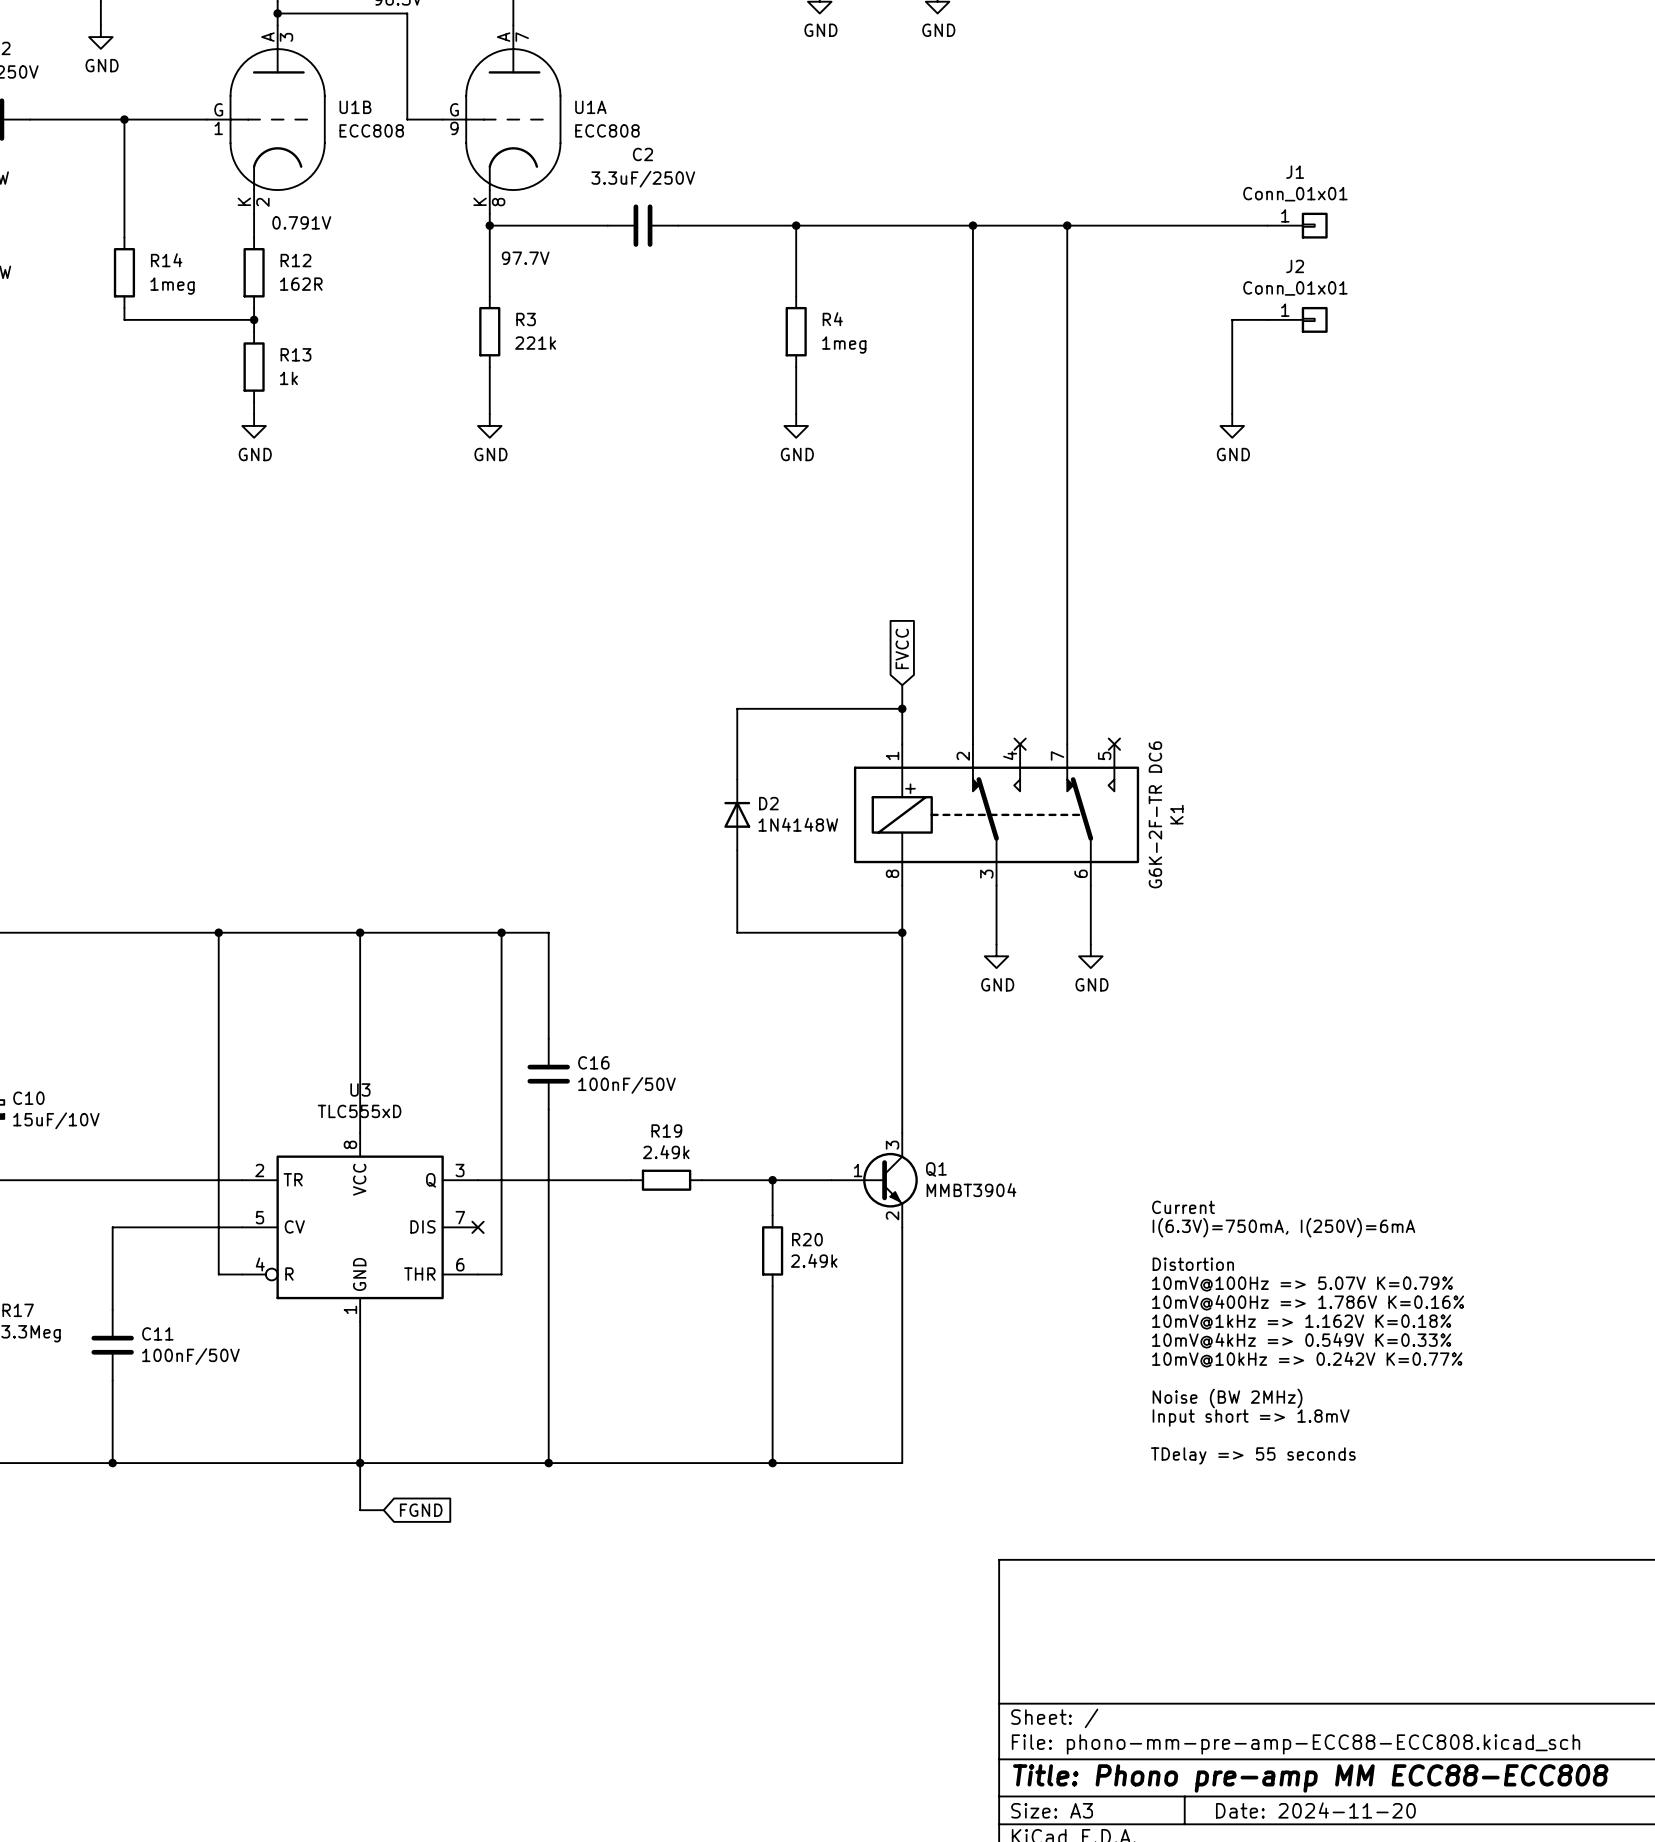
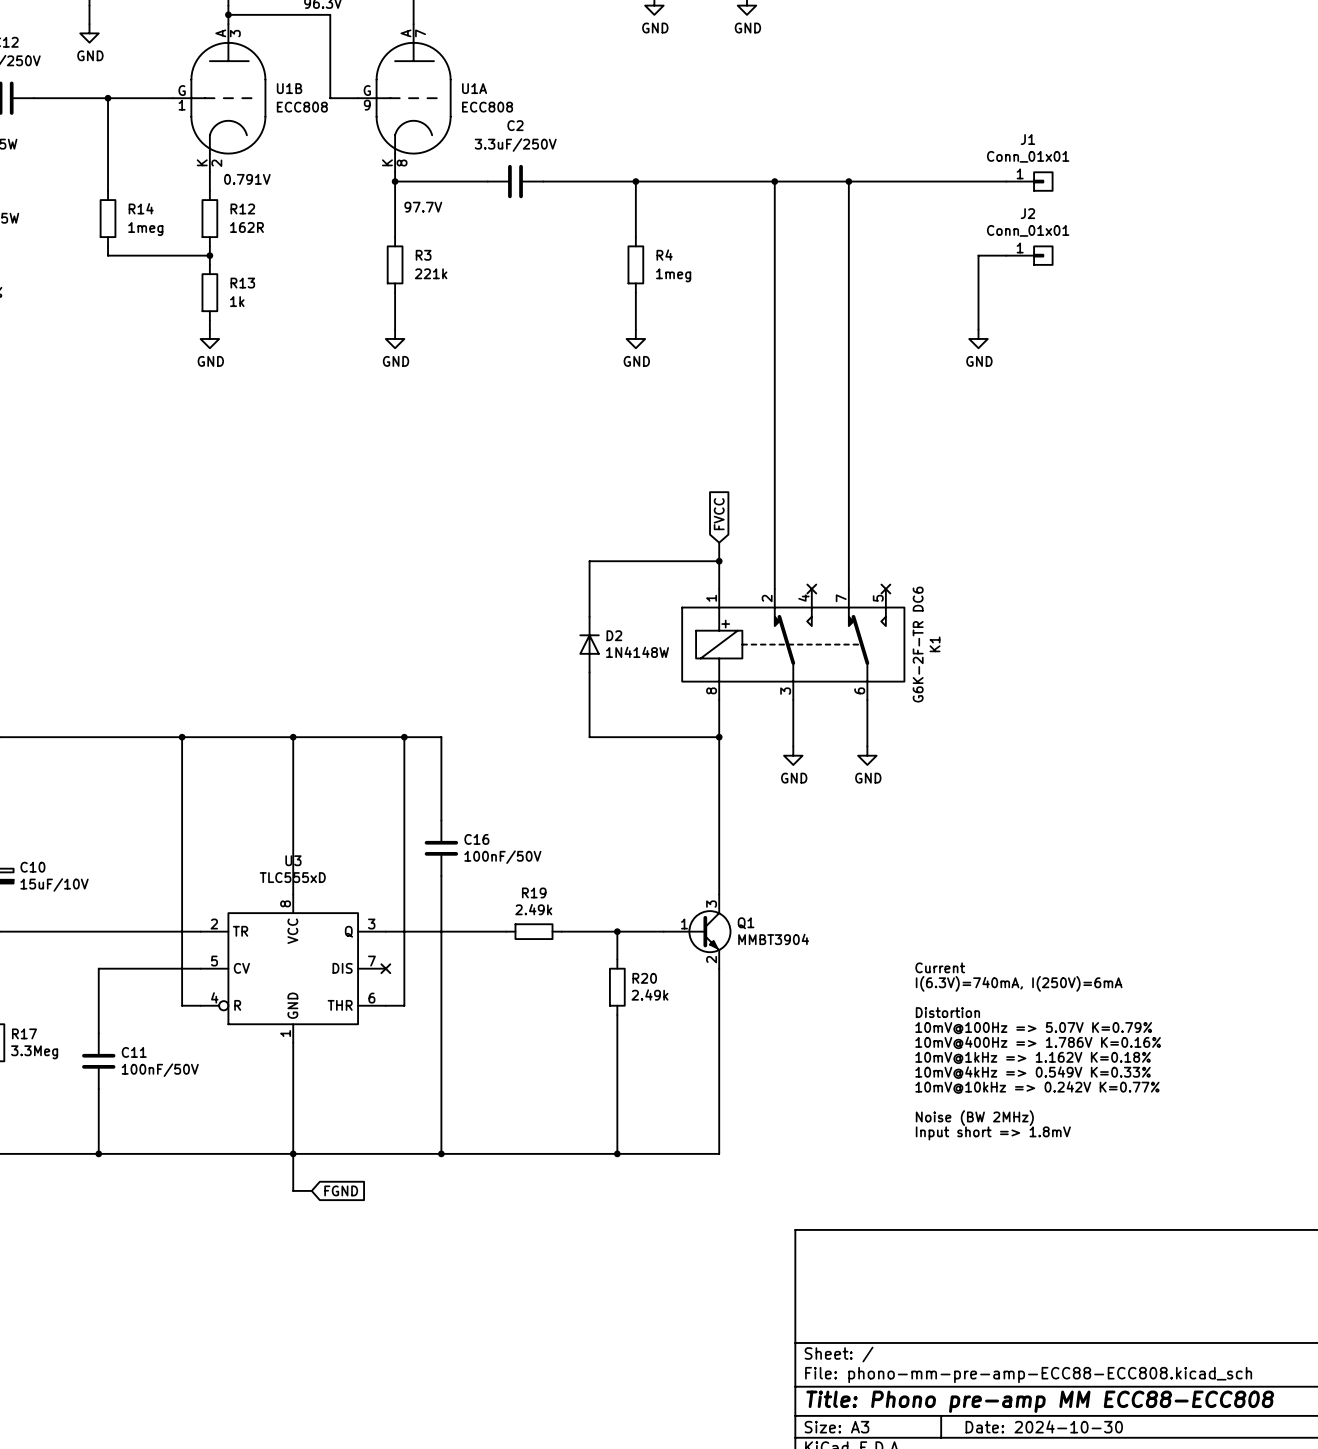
text: Current (1183, 1207) -> none
text: I(6.3V)=750mA, I(250V)=6mA (1283, 1227) -> Current (940, 967)
text: none -> I(6.3V)=740mA, I(250V)=6mA (1019, 983)
text: Distortion (1193, 1264) -> none
text: 10mV@100Hz => 5.07V K=0.79% (1302, 1284) -> Distortion (947, 1012)
text: 10mV@400Hz => 1.786V K=0.16% (1308, 1302) -> 10mV@100Hz => 5.07V K=0.79% (1033, 1028)
text: 10mV@1kHz => 1.162V K=0.18% (1301, 1322) -> 10mV@400Hz => 1.786V K=0.16% (1038, 1042)
text: 10mV@4kHz => 0.549V K=0.33% (1301, 1340) -> 10mV@1kHz => 1.162V K=0.18% (1033, 1057)
text: 10mV@10kHz => 0.242V K=0.77% (1307, 1359) -> 10mV@4kHz => 0.549V K=0.33% (1033, 1072)
text: none -> 10mV@10kHz => 0.242V K=0.77% (1037, 1087)
text: Noise (BW 2MHz) (1227, 1398) -> none
text: Input short => 1.8mV (1251, 1418) -> Noise (BW 2MHz) (974, 1118)
text: none -> Input short => 1.8mV (993, 1133)
text: TDelay => 55 seconds (1253, 1455) -> none
title block: Date: 2024-11-20 (1315, 1810) -> Date: 2024-10-30 (1044, 1426)

